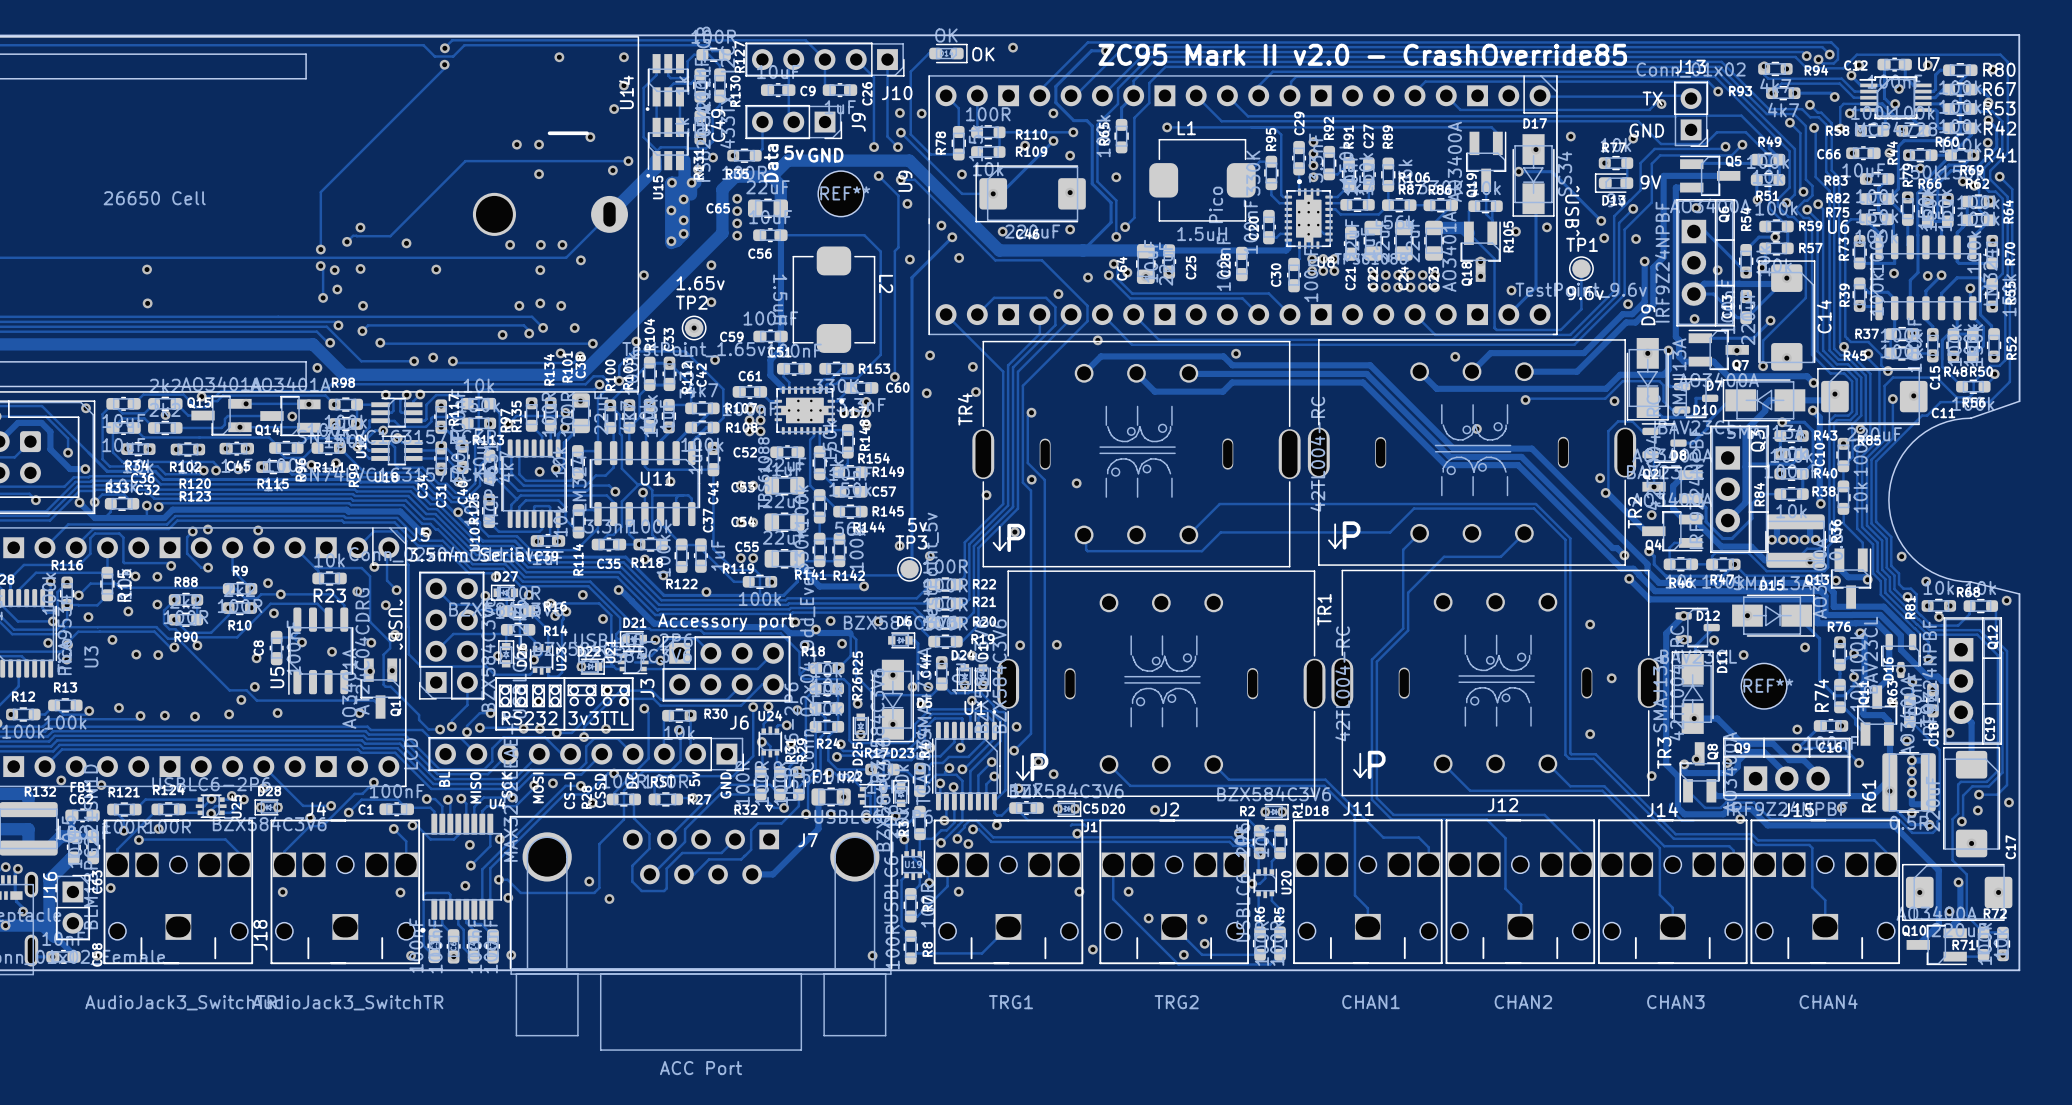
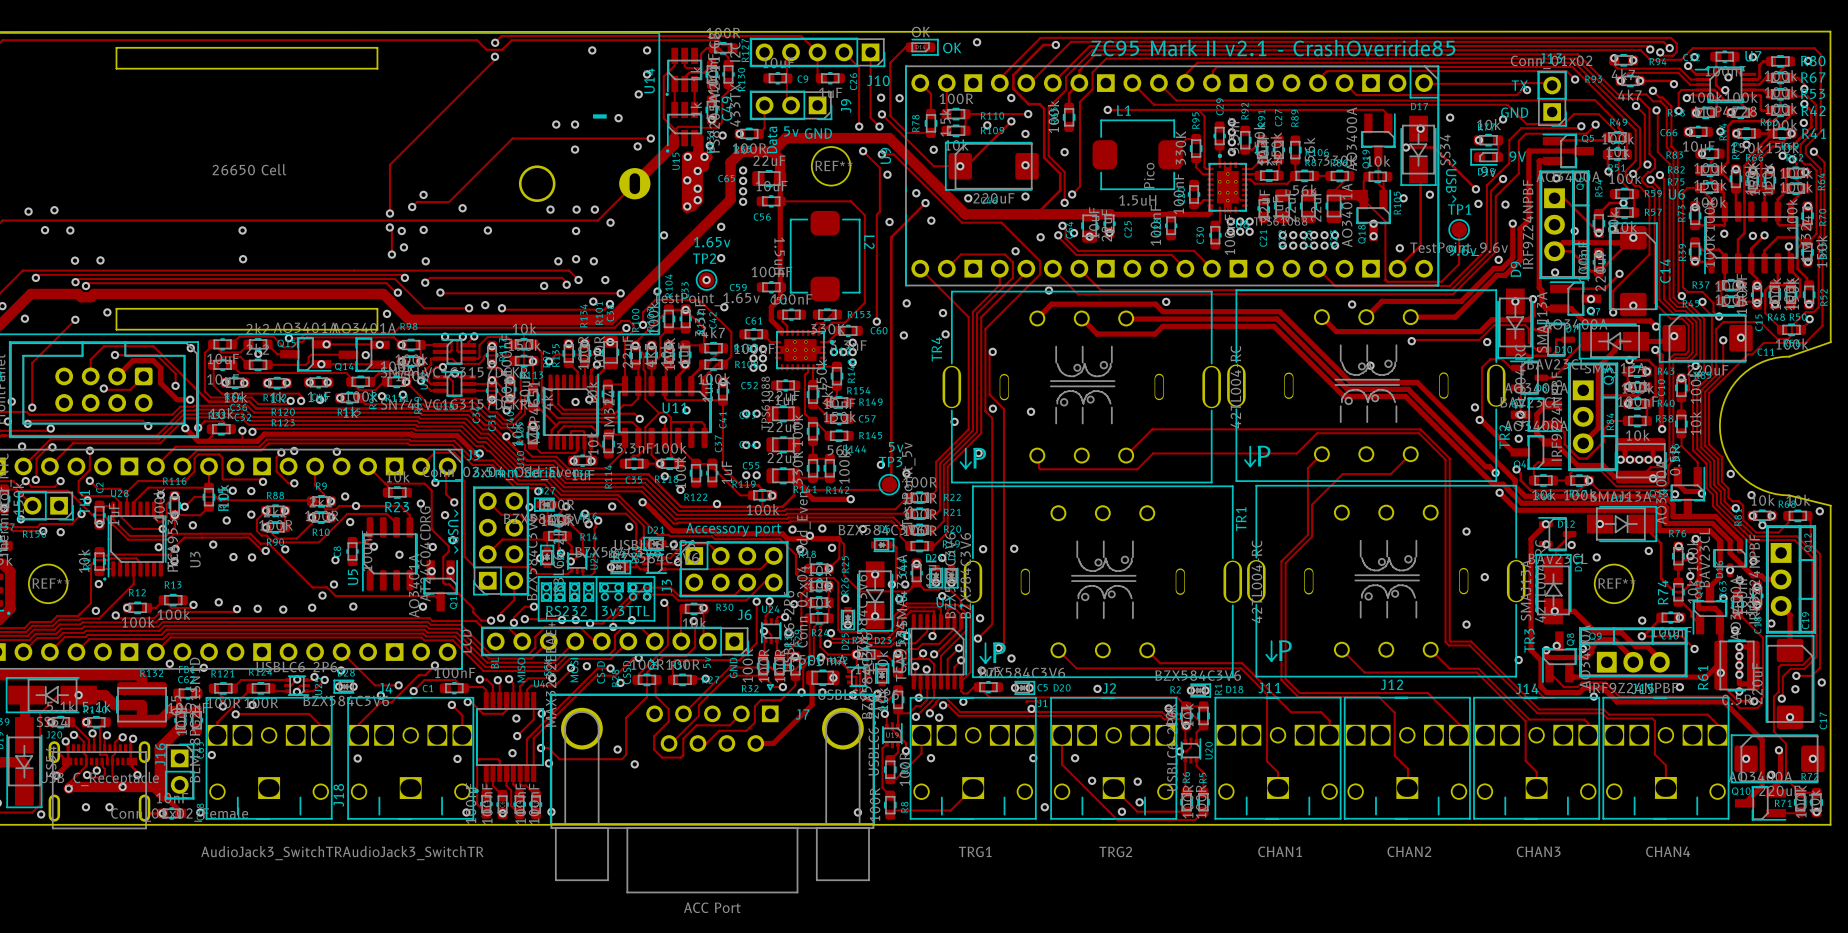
text: ZC95 Mark II v2.0 - CrashOverride85 (1362, 54) -> ZC95 Mark II v2.1 - CrashOverride85 (1273, 47)

